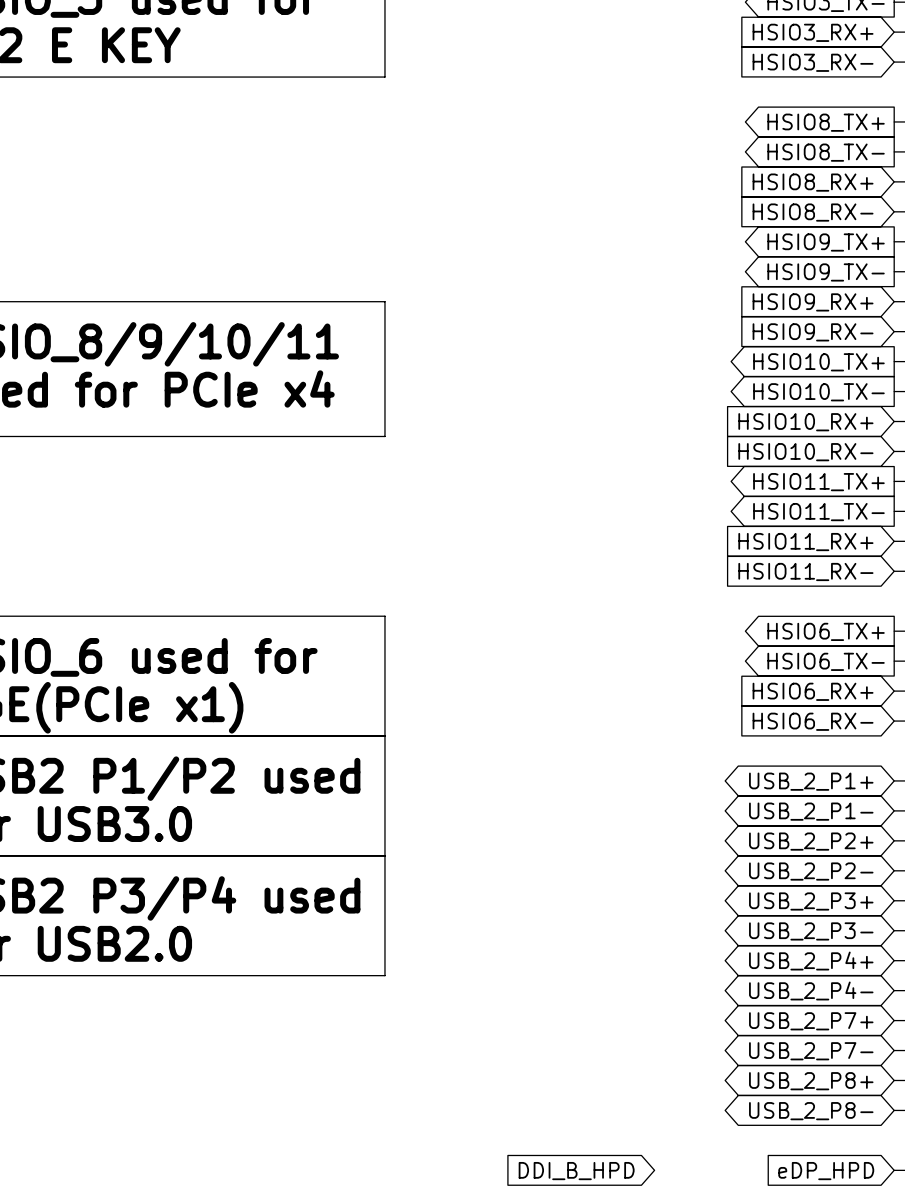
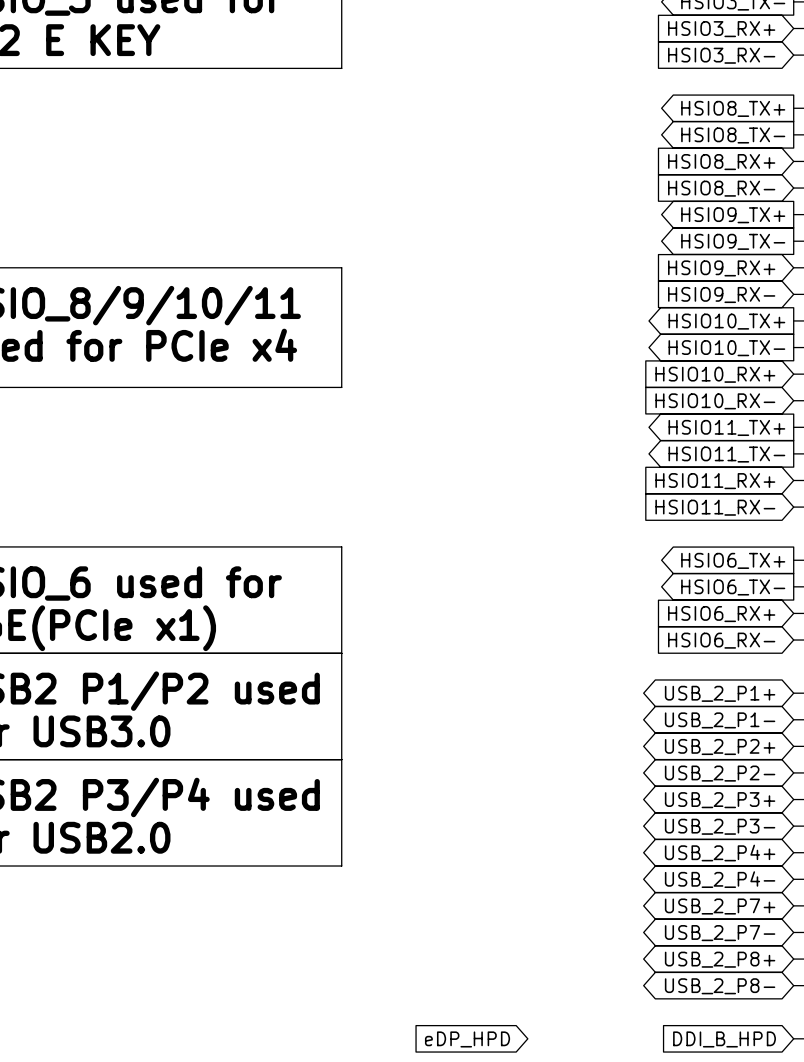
global label: DDI_B_HPD (576, 1171) -> eDP_HPD (467, 1039)
global label: eDP_HPD (826, 1171) -> DDI_B_HPD (724, 1039)

